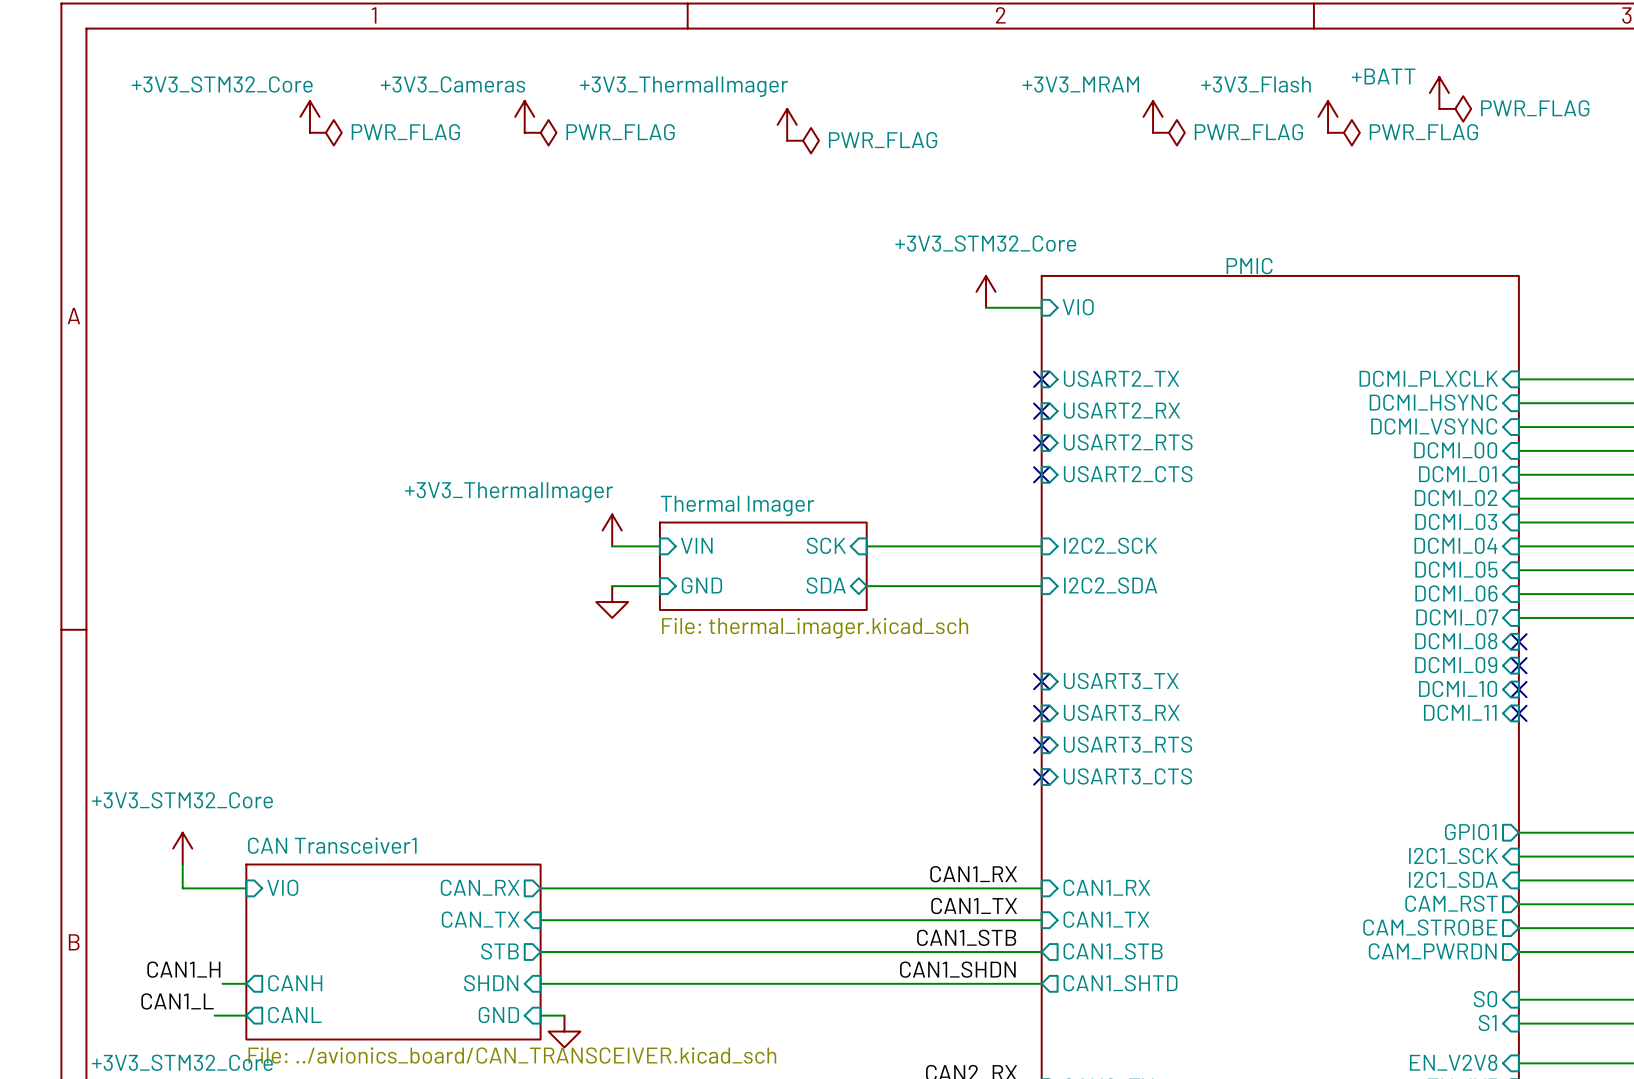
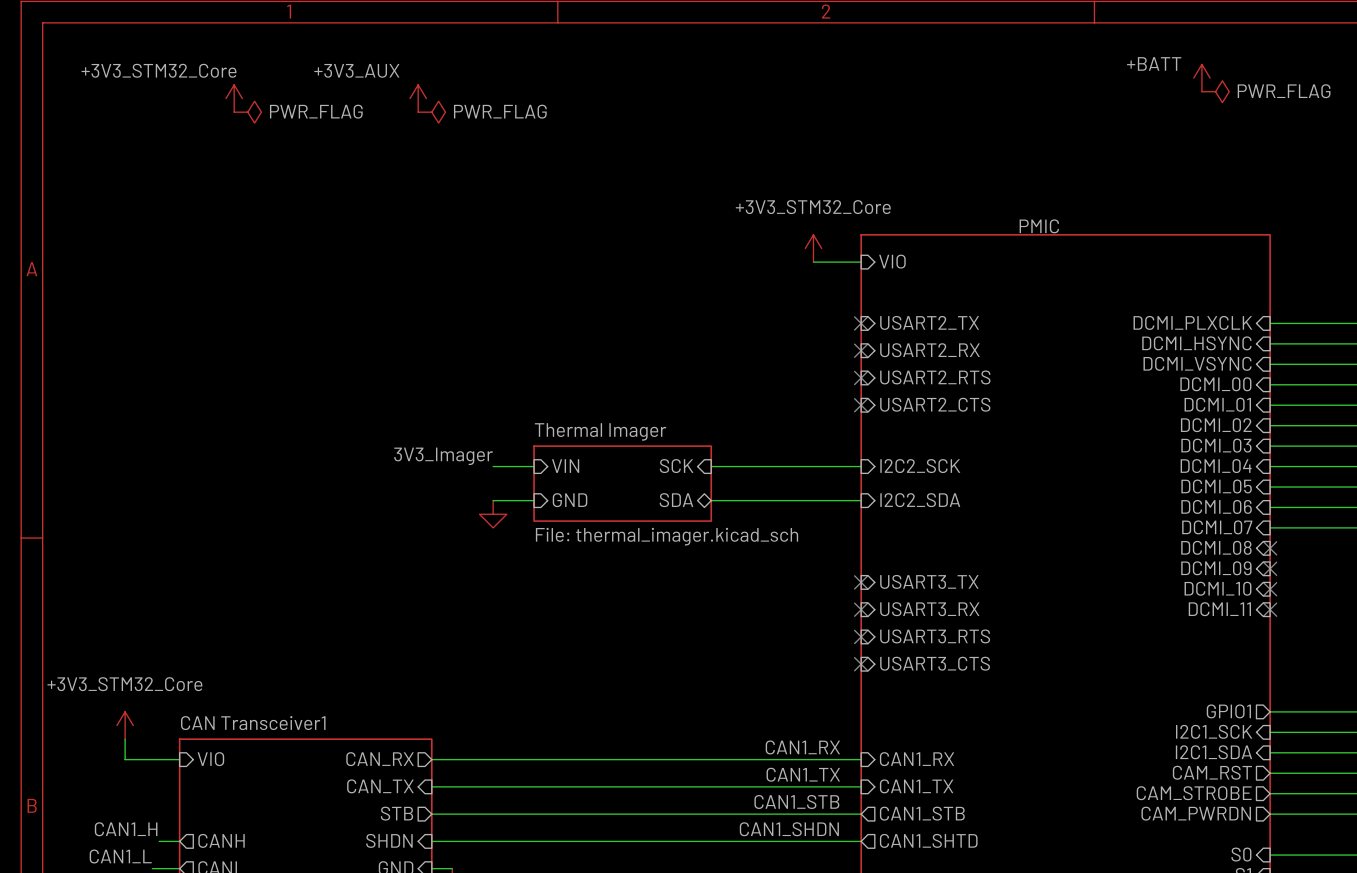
power symbol: +3V3_Cameras (524, 116) -> +3V3_AUX (418, 98)
power symbol: +3V3_MRAM (1153, 116) -> none
power symbol: +3V3_Flash (1328, 116) -> none
power symbol: +3V3_ThermalImager (787, 124) -> none
power symbol: PWR_FLAG (1168, 132) -> none
power symbol: PWR_FLAG (1343, 132) -> none
power symbol: PWR_FLAG (803, 140) -> none
power symbol: +3V3_ThermalImager (612, 530) -> none
label: none -> 3V3_Imager (443, 456)

